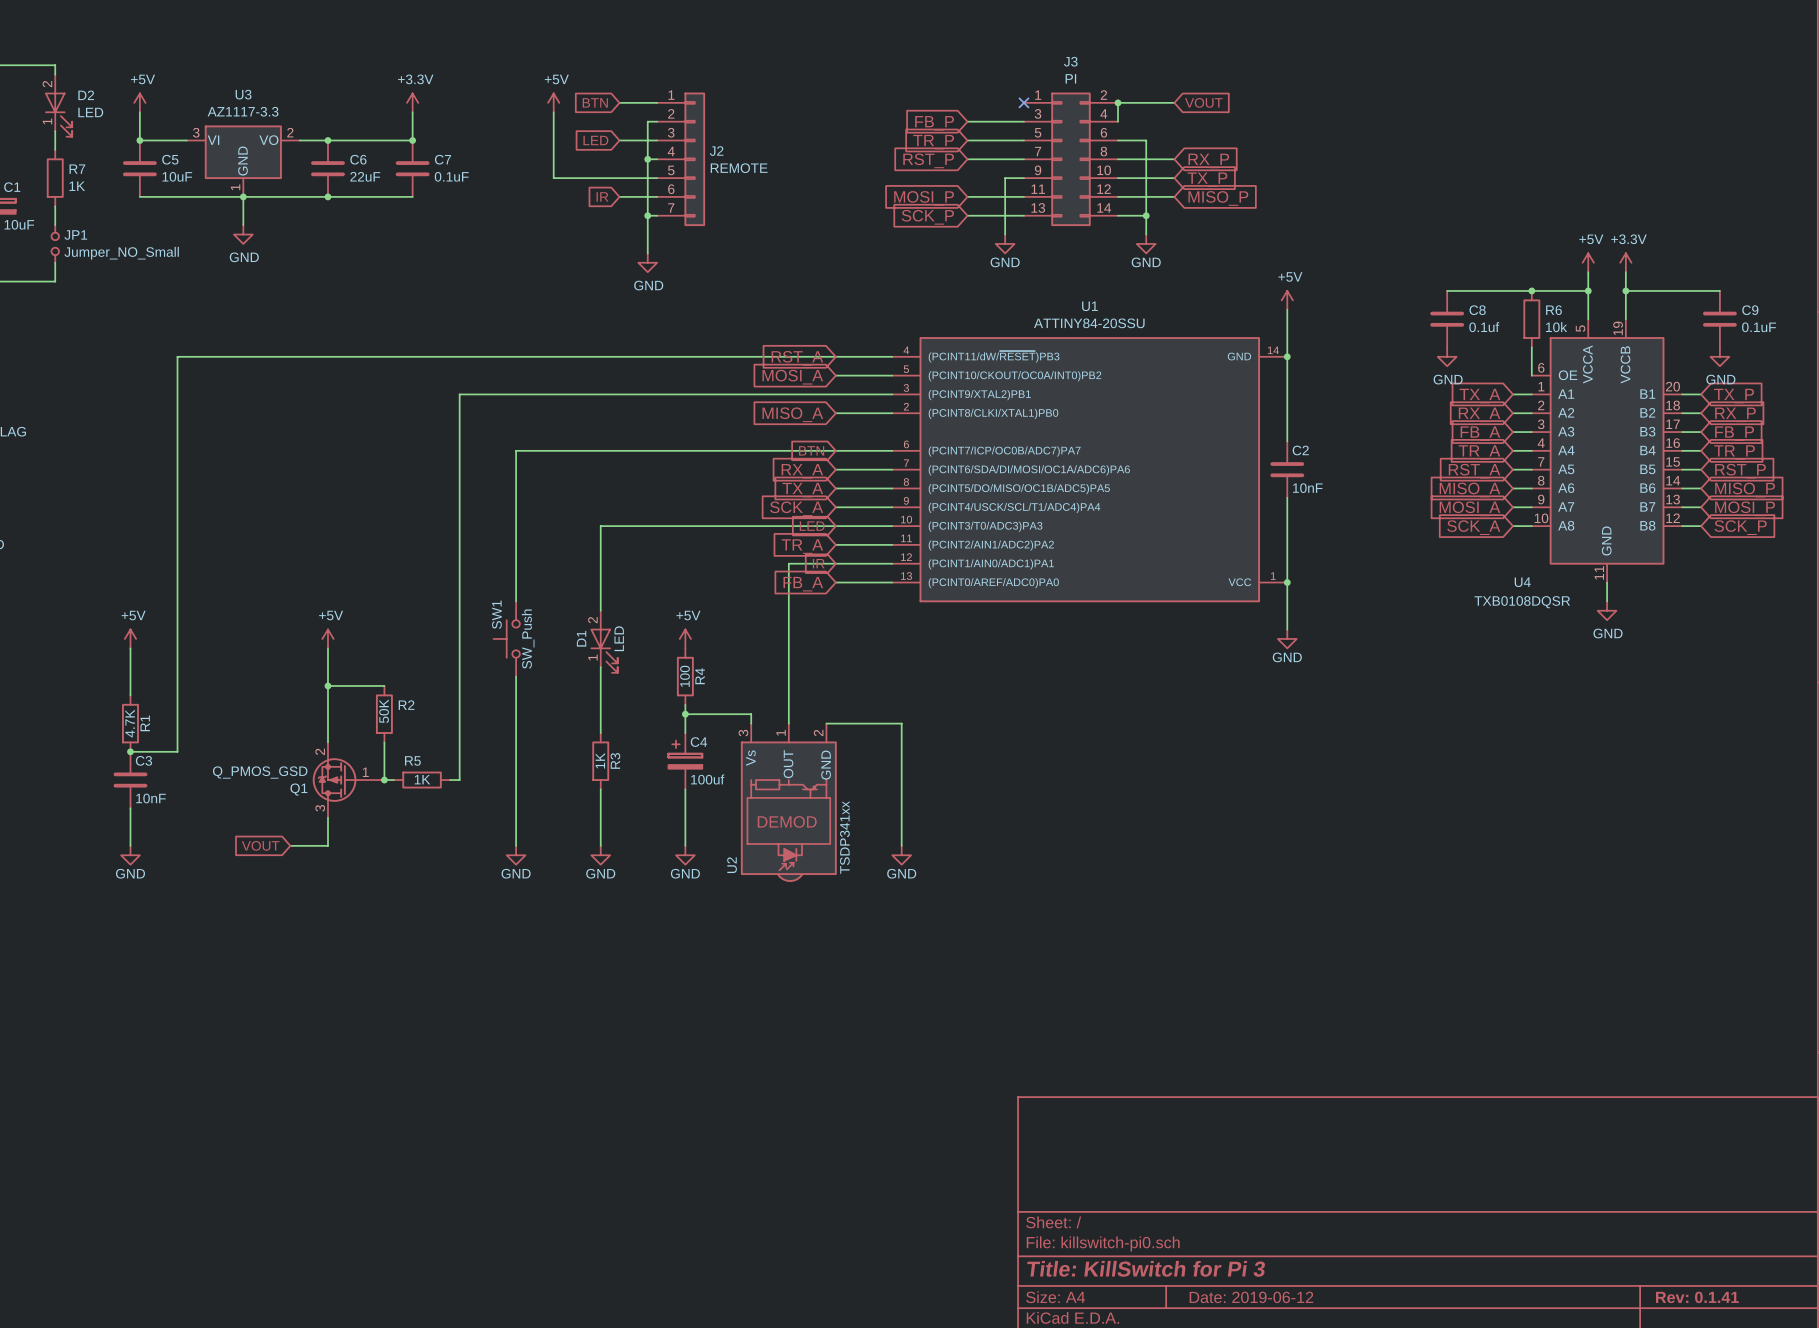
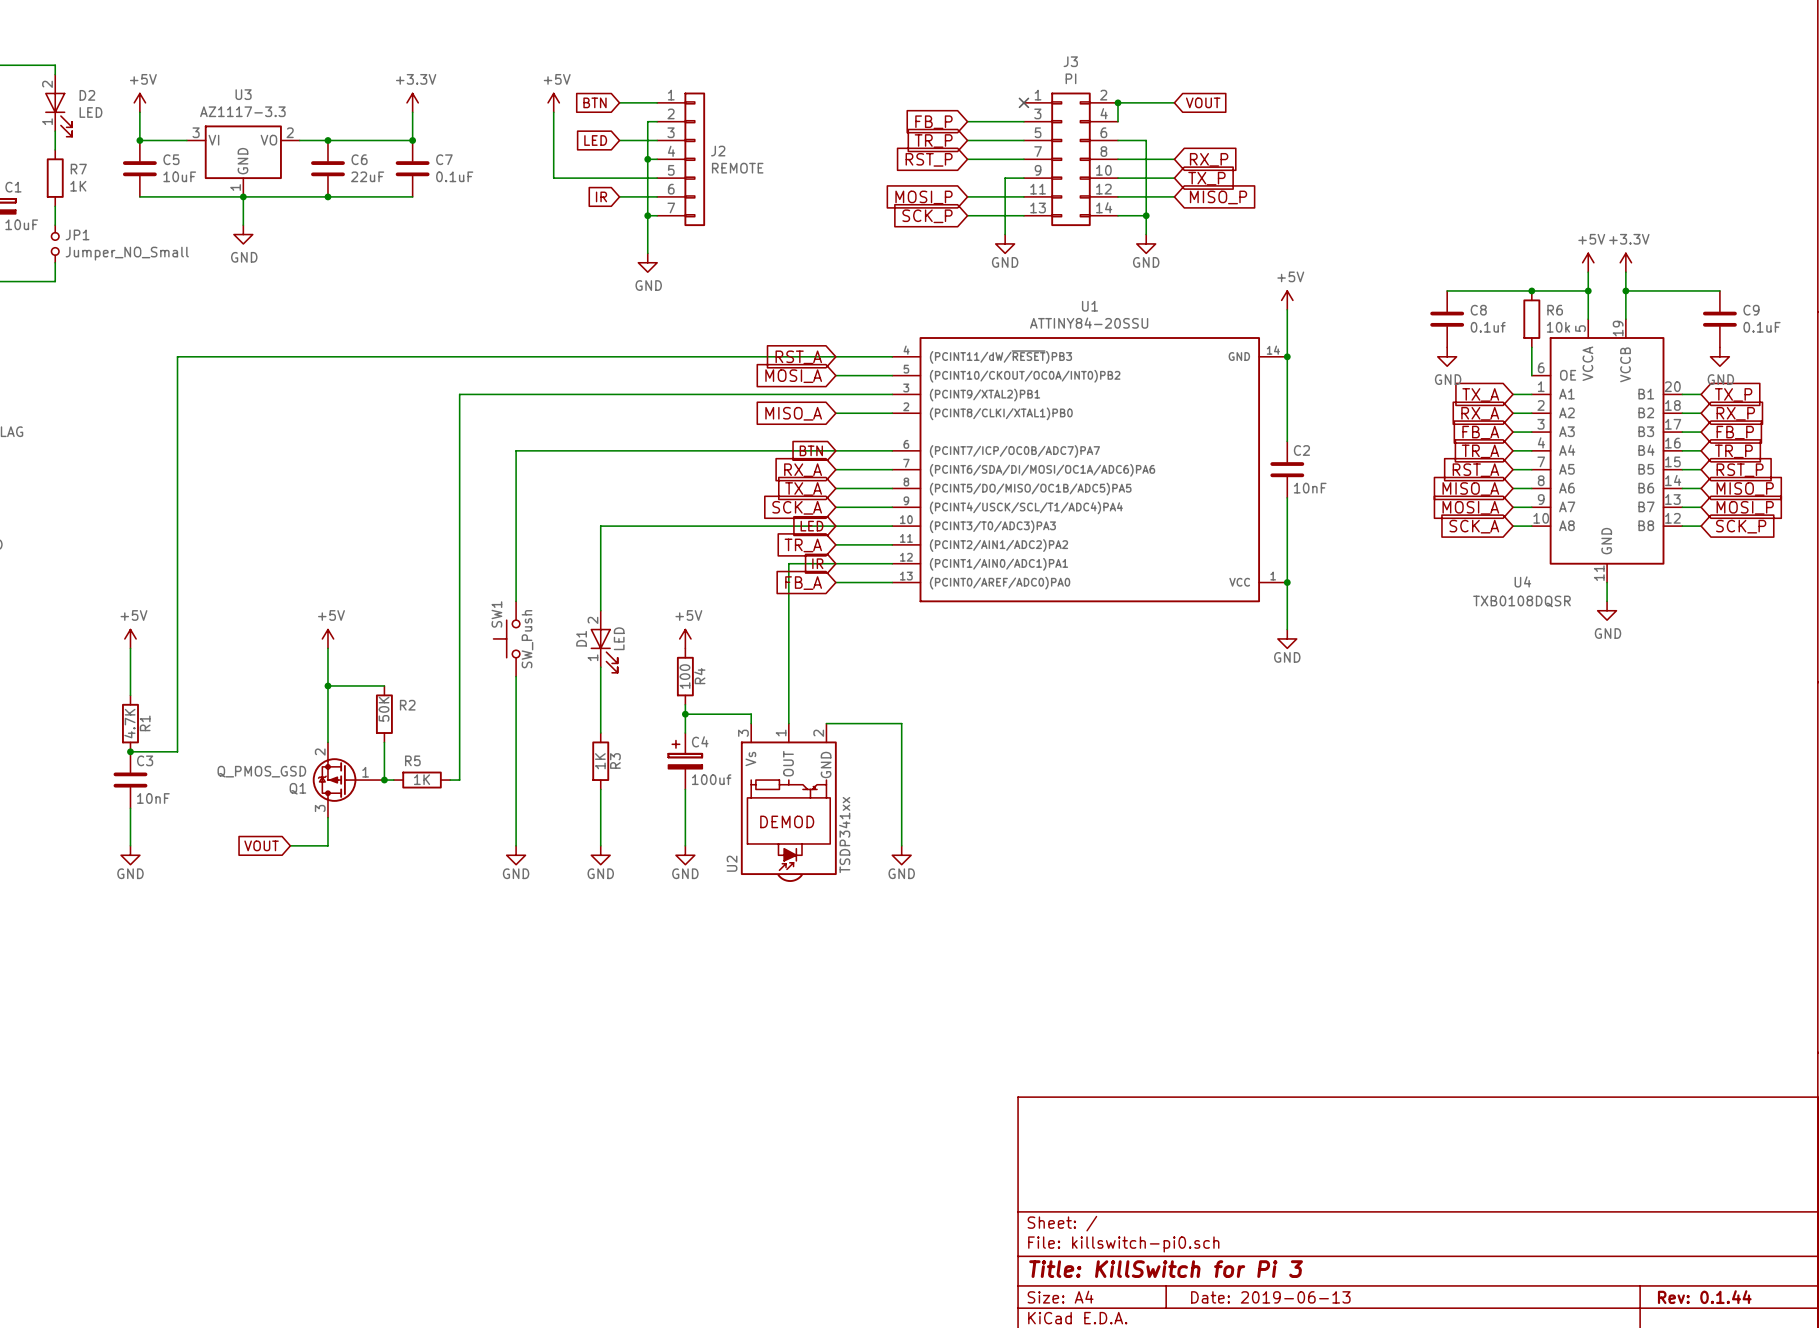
title block: Date: 2019-06-12 (1251, 1297) -> Date: 2019-06-13 (1270, 1297)
title block: Rev: 0.1.41 (1697, 1297) -> Rev: 0.1.44 (1704, 1297)

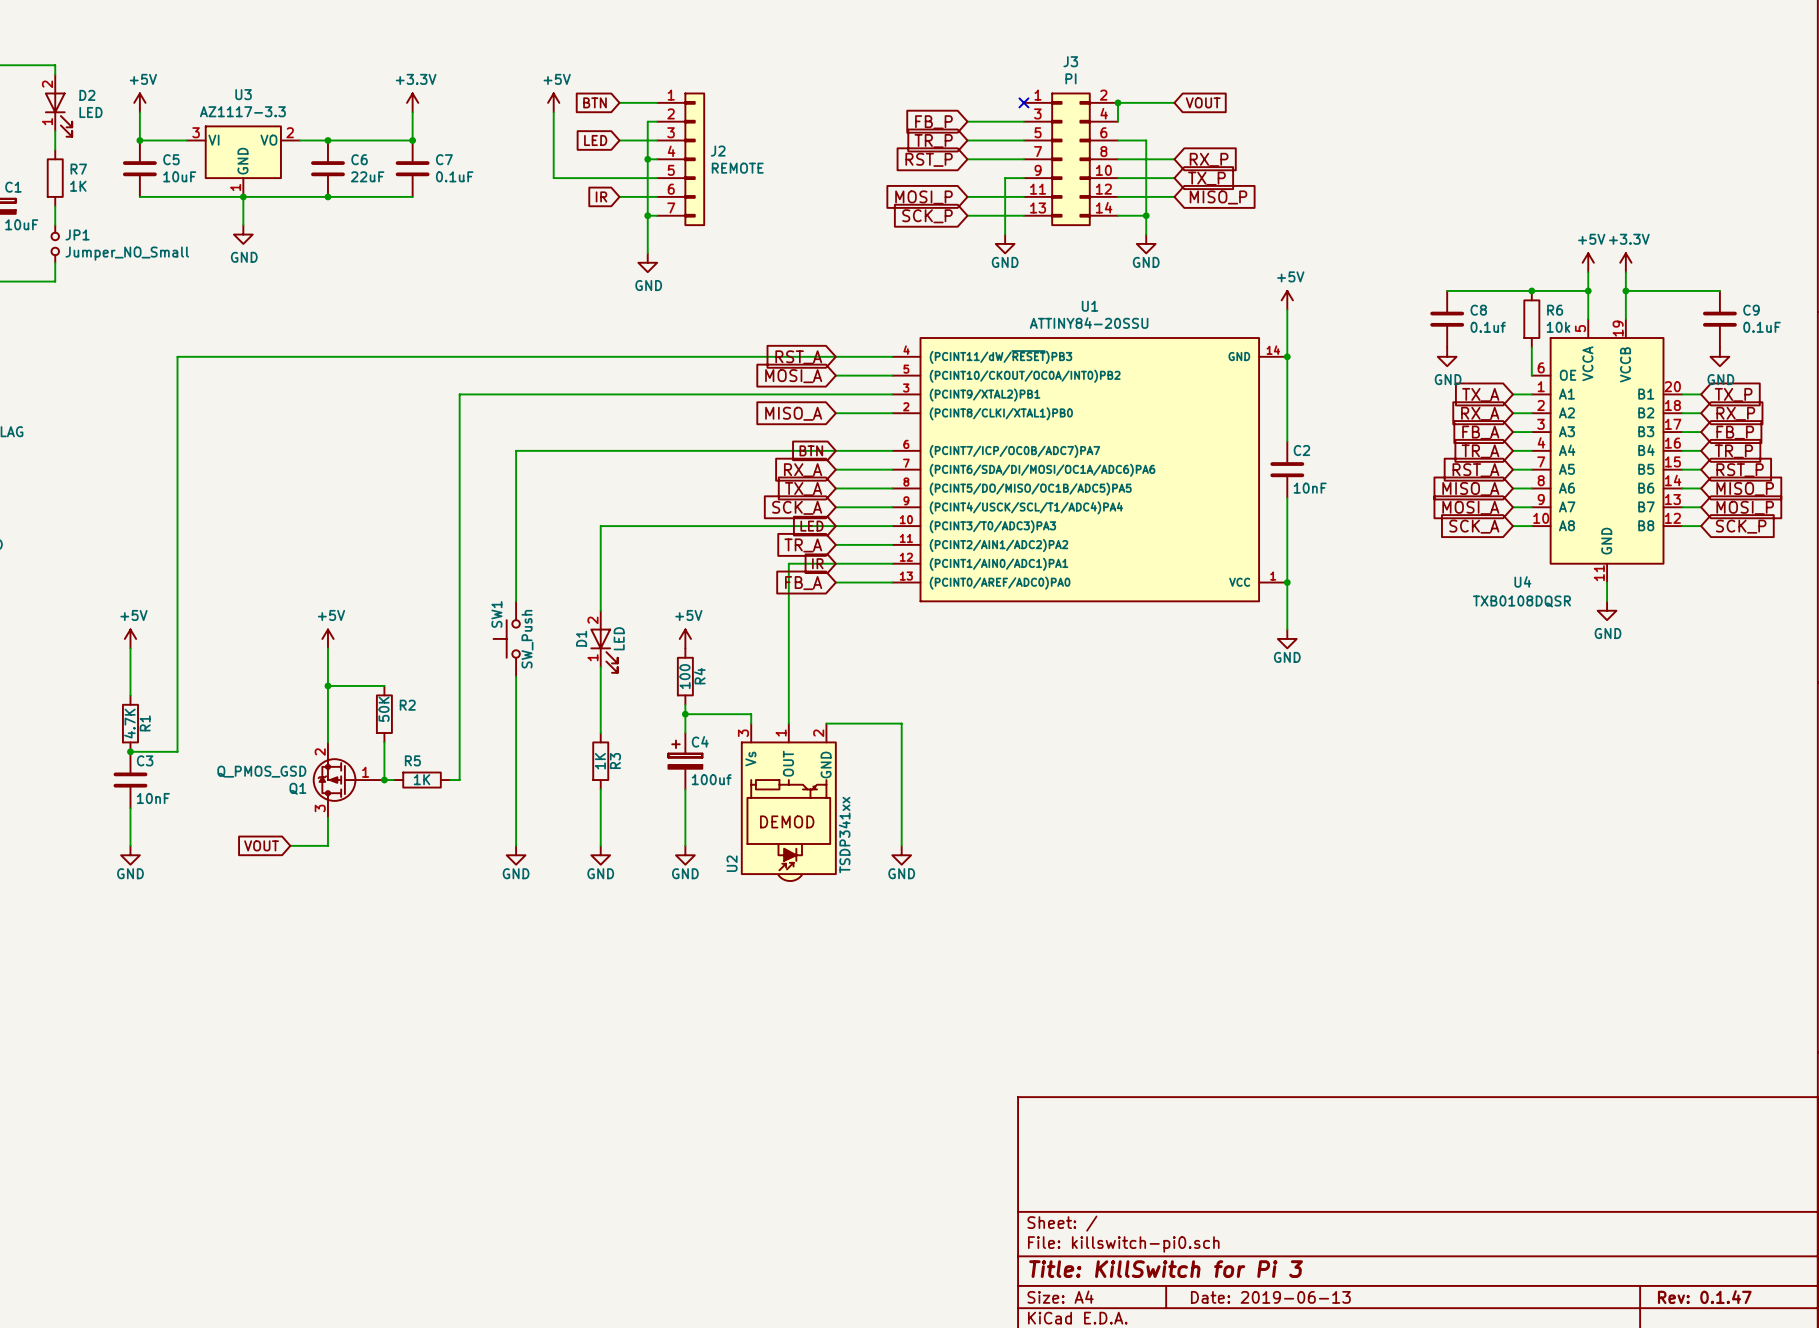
title block: Rev: 0.1.44 (1704, 1297) -> Rev: 0.1.47 (1704, 1297)

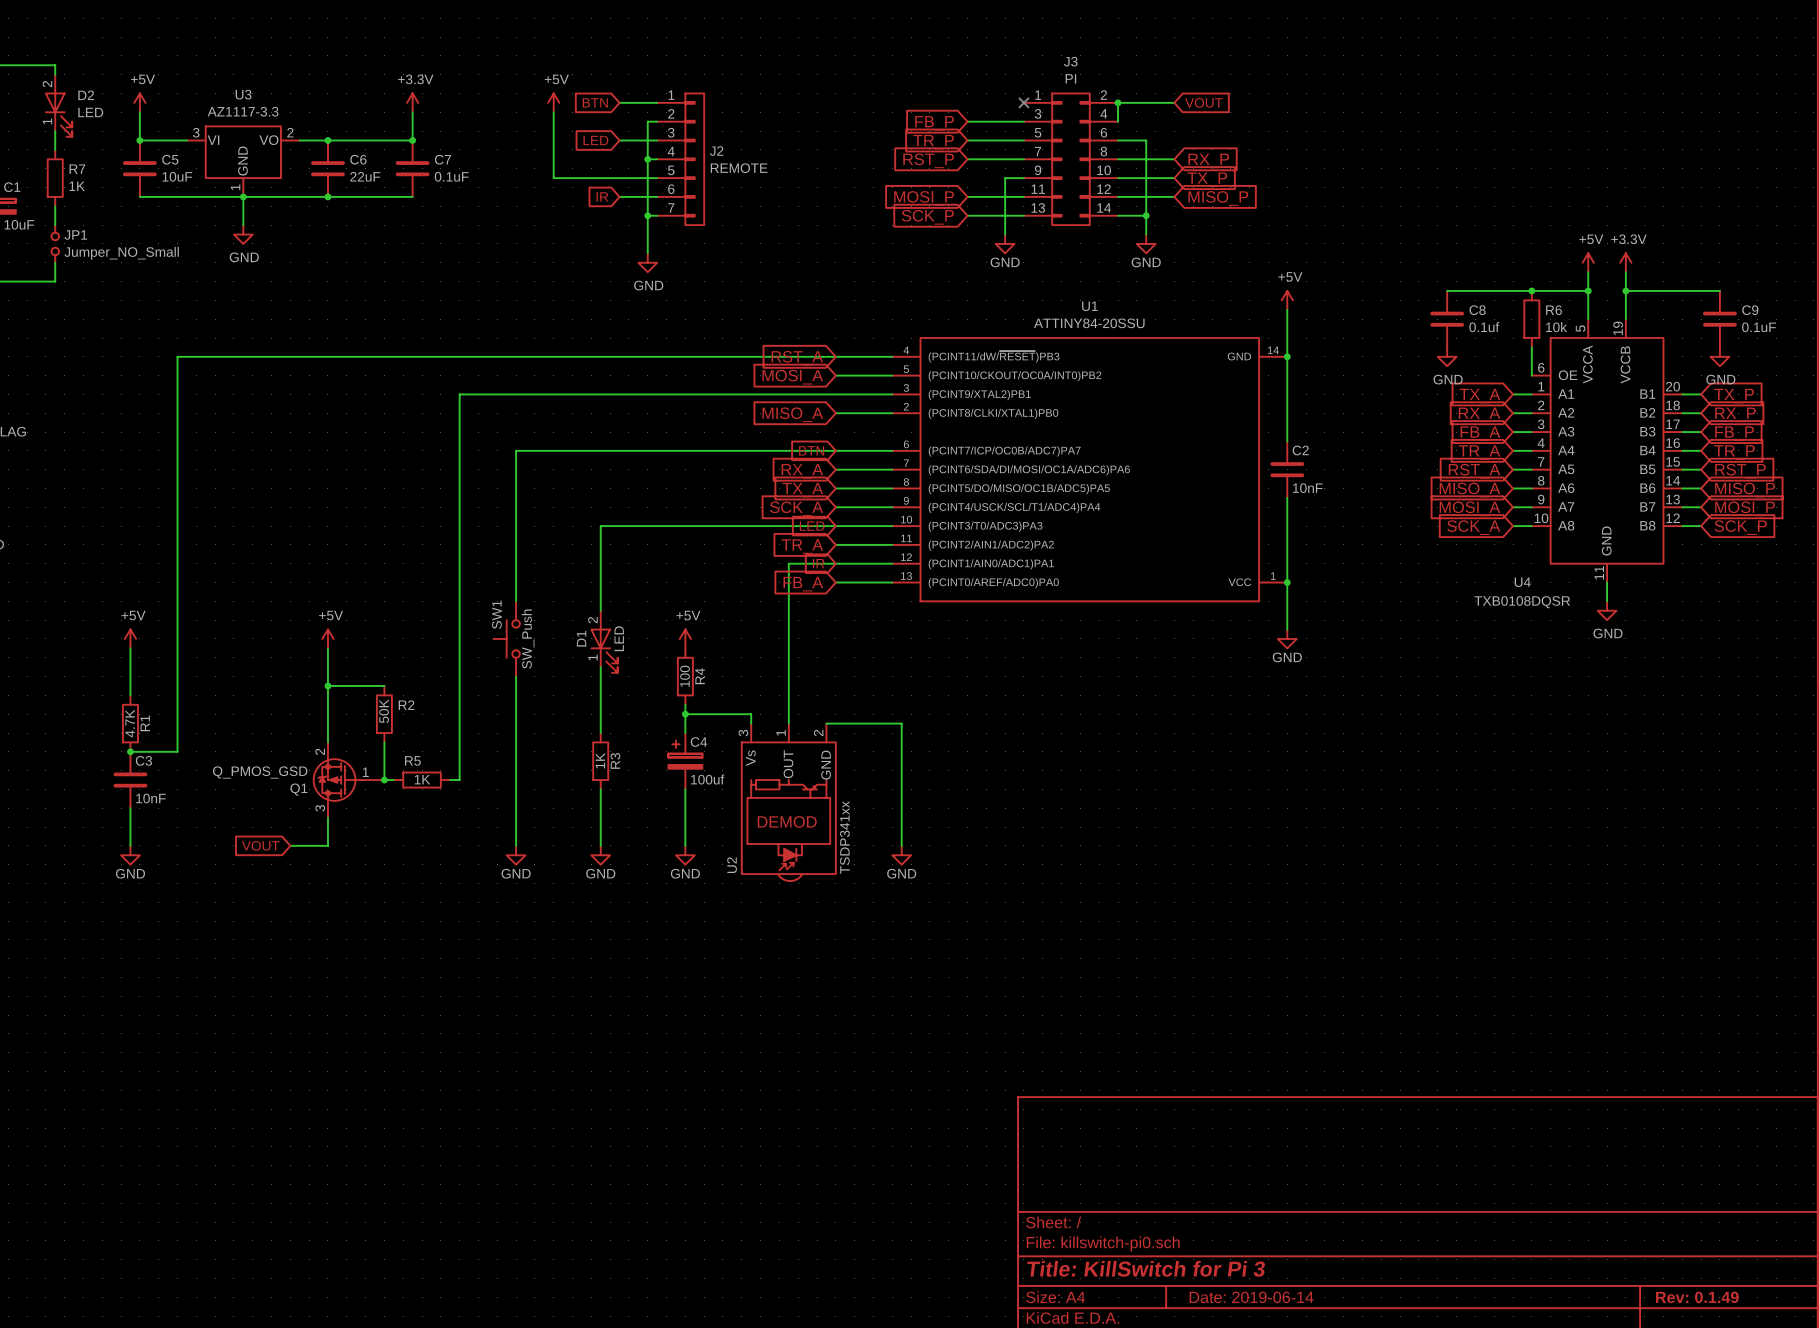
title block: Date: 2019-06-13 (1270, 1297) -> Date: 2019-06-14 (1251, 1297)
title block: Rev: 0.1.47 (1704, 1297) -> Rev: 0.1.49 (1697, 1297)

